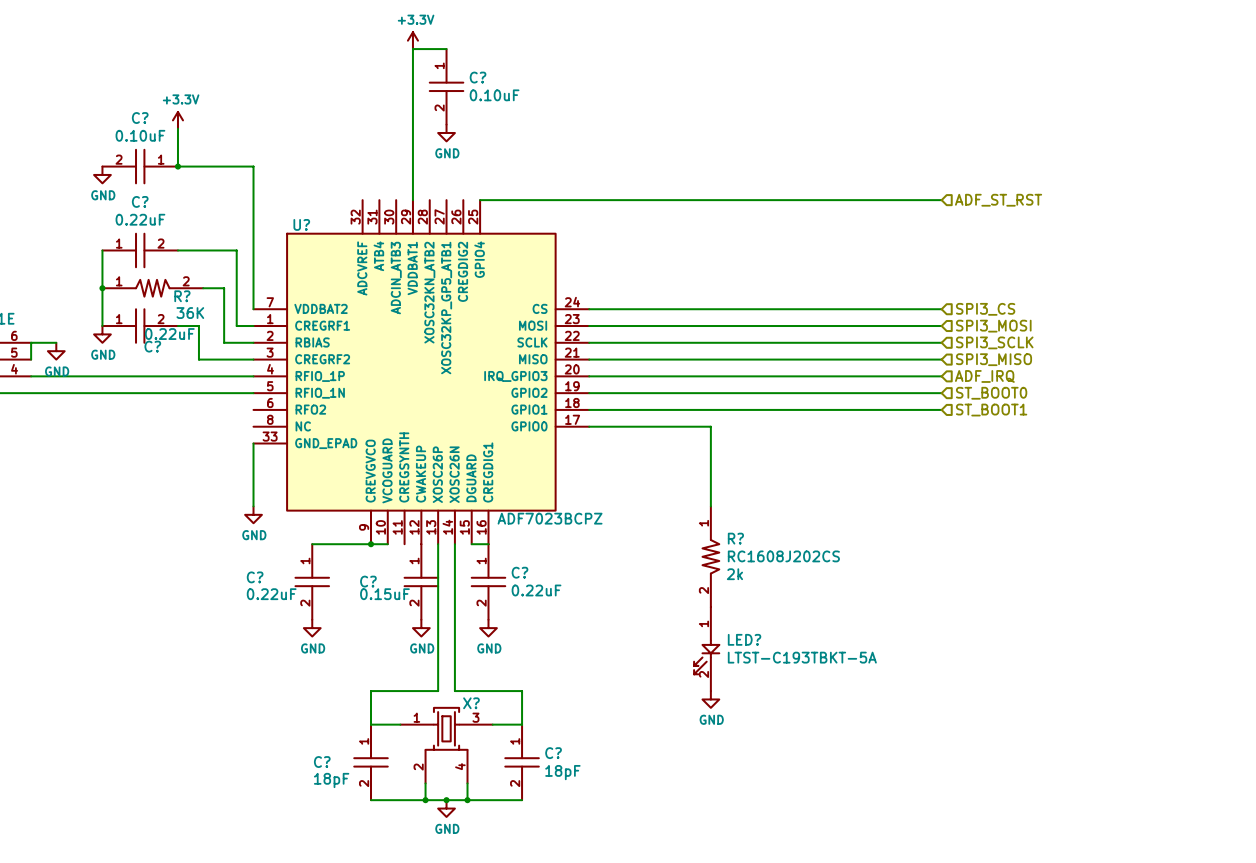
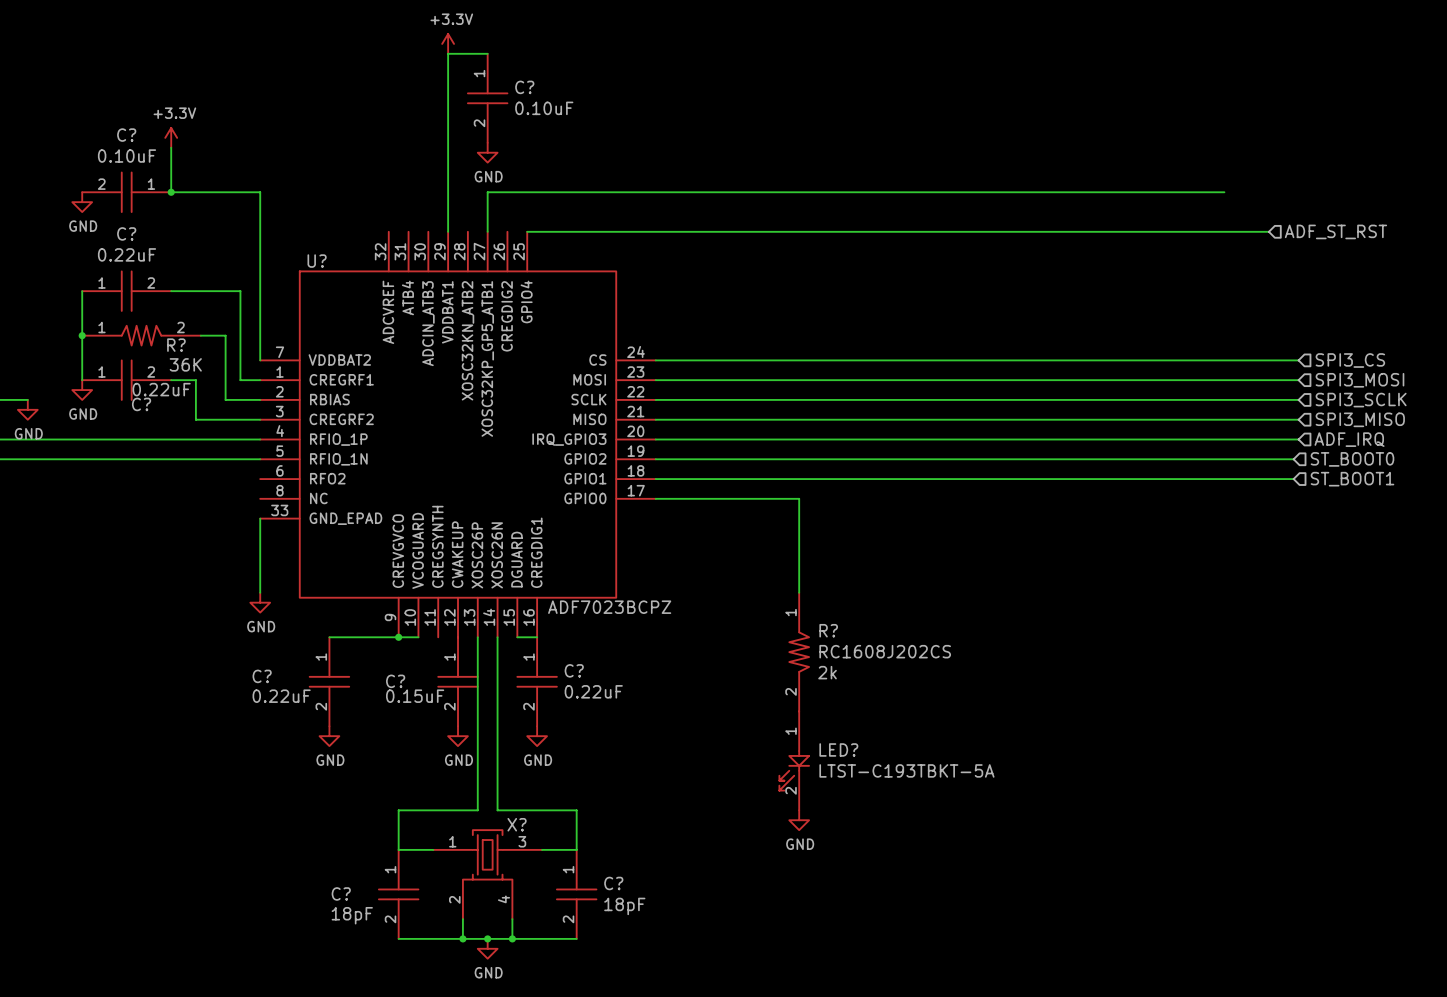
wire: none -> (1224, 192) (487, 192) (487, 231)
wire: none -> (1071, 231) (1268, 231)
hierarchical label: ADF_ST_RST (998, 200) -> none
hierarchical label: none -> ADF_ST_RST (1335, 231)
wire: none -> (1071, 360) (1298, 360)
hierarchical label: SPI3_CS (985, 309) -> none
hierarchical label: none -> SPI3_CS (1350, 360)
wire: none -> (1071, 380) (1298, 380)
hierarchical label: SPI3_MOSI (993, 326) -> none
hierarchical label: none -> SPI3_MOSI (1359, 380)
wire: none -> (1071, 399) (1298, 399)
hierarchical label: SPI3_SCLK (994, 342) -> none
hierarchical label: none -> SPI3_SCLK (1361, 400)
wire: none -> (1071, 419) (1298, 419)
hierarchical label: SPI3_MISO (993, 359) -> none
hierarchical label: none -> SPI3_MISO (1360, 419)
wire: none -> (1071, 439) (1298, 439)
hierarchical label: ADF_IRQ (984, 376) -> none
hierarchical label: none -> ADF_IRQ (1349, 439)
wire: none -> (1071, 459) (1293, 459)
hierarchical label: ST_BOOT0 (991, 393) -> none
hierarchical label: none -> ST_BOOT0 (1352, 459)
wire: none -> (1071, 479) (1293, 479)
hierarchical label: ST_BOOT1 (991, 410) -> none
hierarchical label: none -> ST_BOOT1 (1352, 479)

